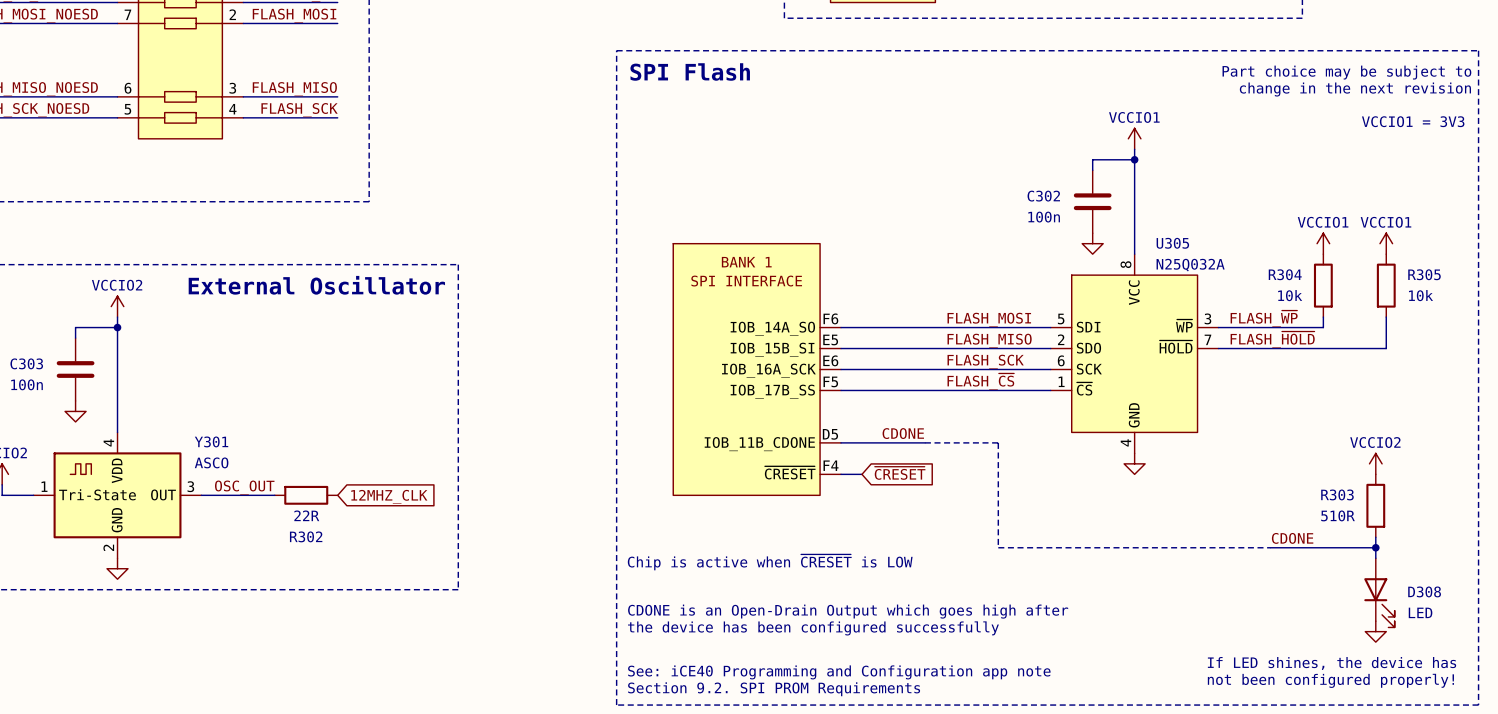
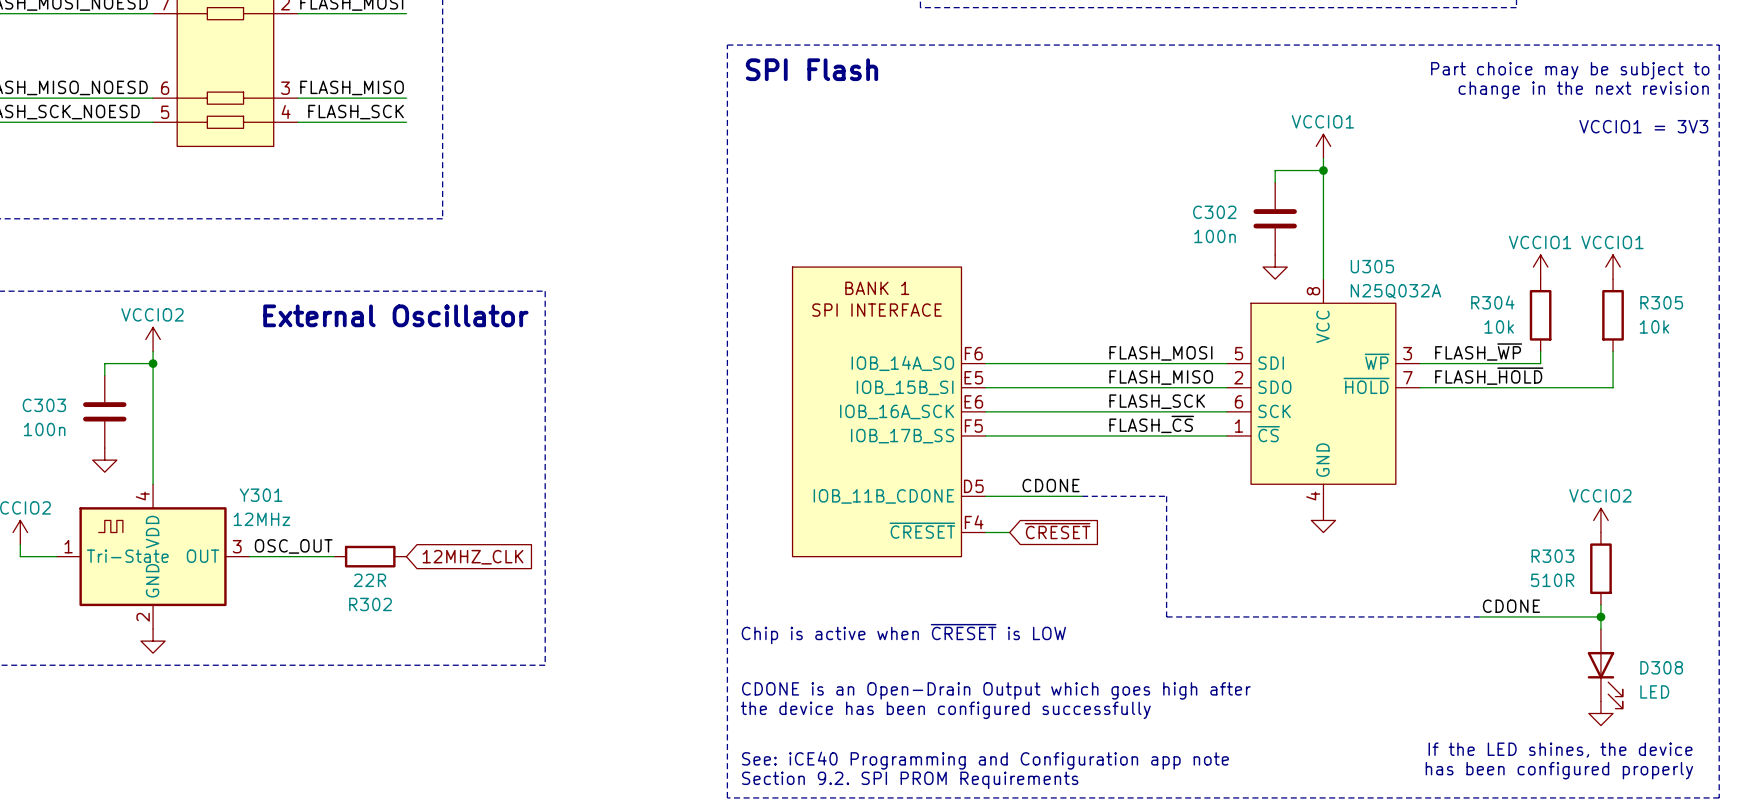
Y301 value: ASCO (211, 462) -> 12MHz (261, 519)
text: If LED shines, the device has (1332, 663) -> If the LED shines, the device (1560, 750)
text: not been configured properly! (1330, 680) -> has been configured properly (1559, 770)

